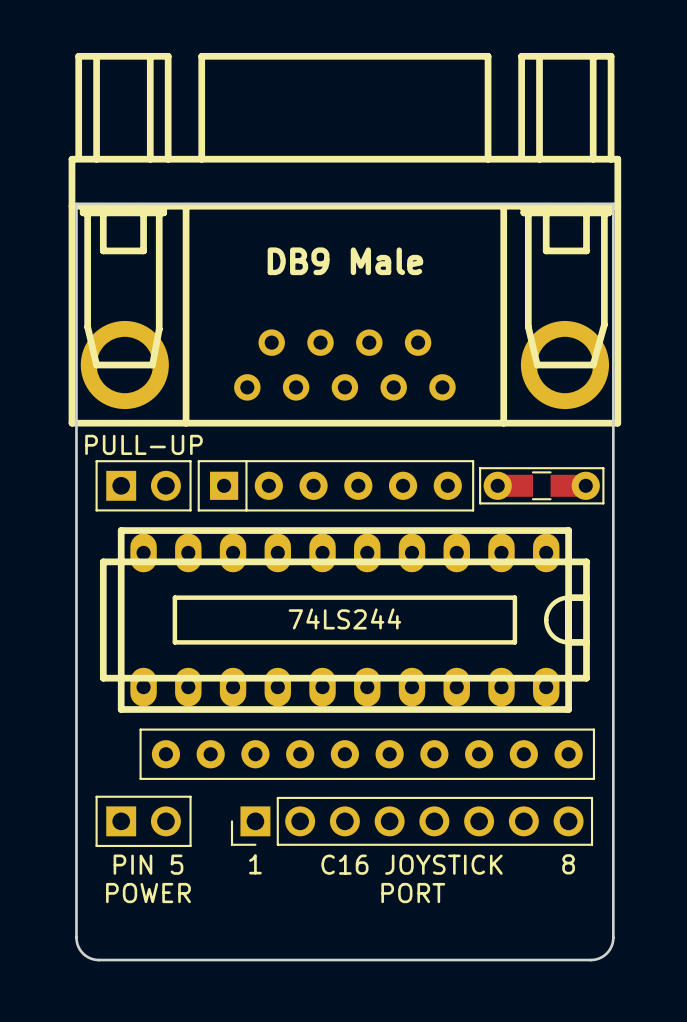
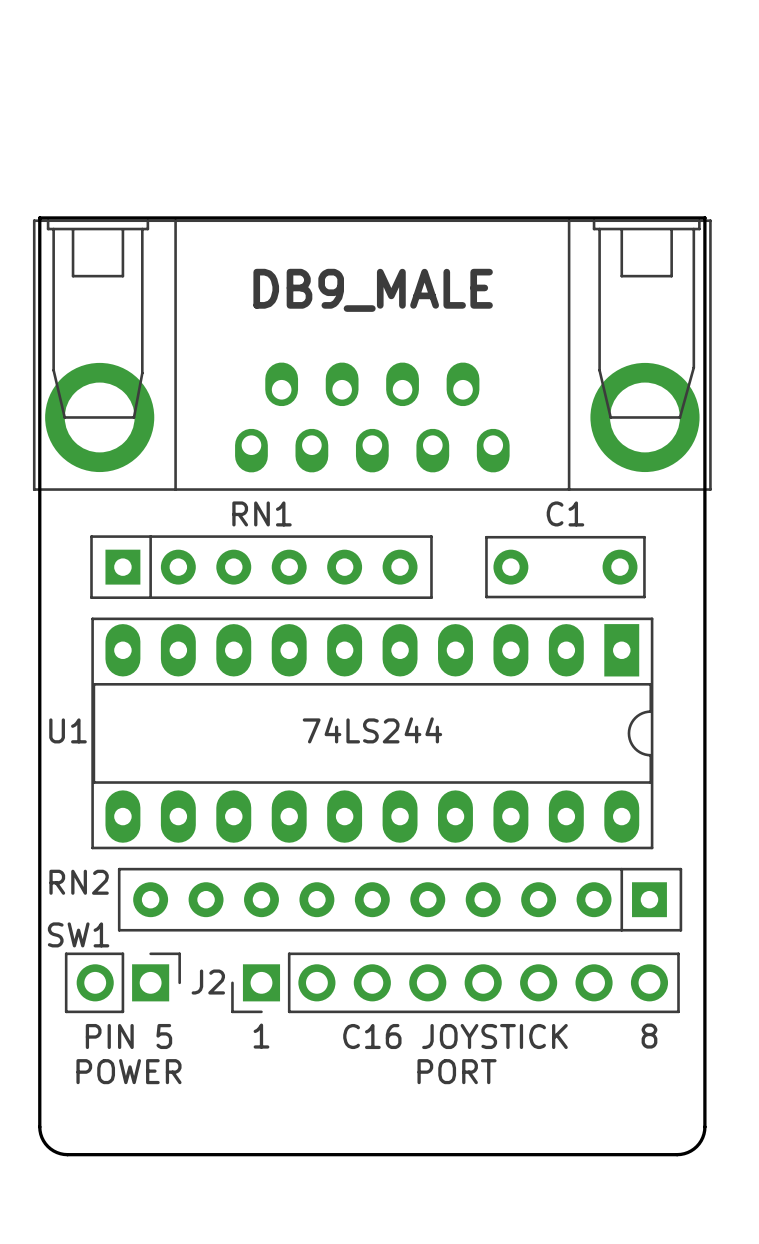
part: DB9 Male (344, 239) -> none
part: none -> DB9_MALE (372, 355)
text: PULL-UP (143, 444) -> none
part: (143, 485) -> none
RN1: none -> (261, 567)
part: (335, 485) -> none
C1: none -> (565, 567)
part: (541, 485) -> none
part: 74LS244 (344, 620) -> none
U1: none -> 74LS244 (372, 733)
part: (367, 754) -> none
RN2: none -> (400, 899)
J2 name: none -> J2 (208, 982)
part: (143, 821) -> none
SW1: none -> (122, 982)

